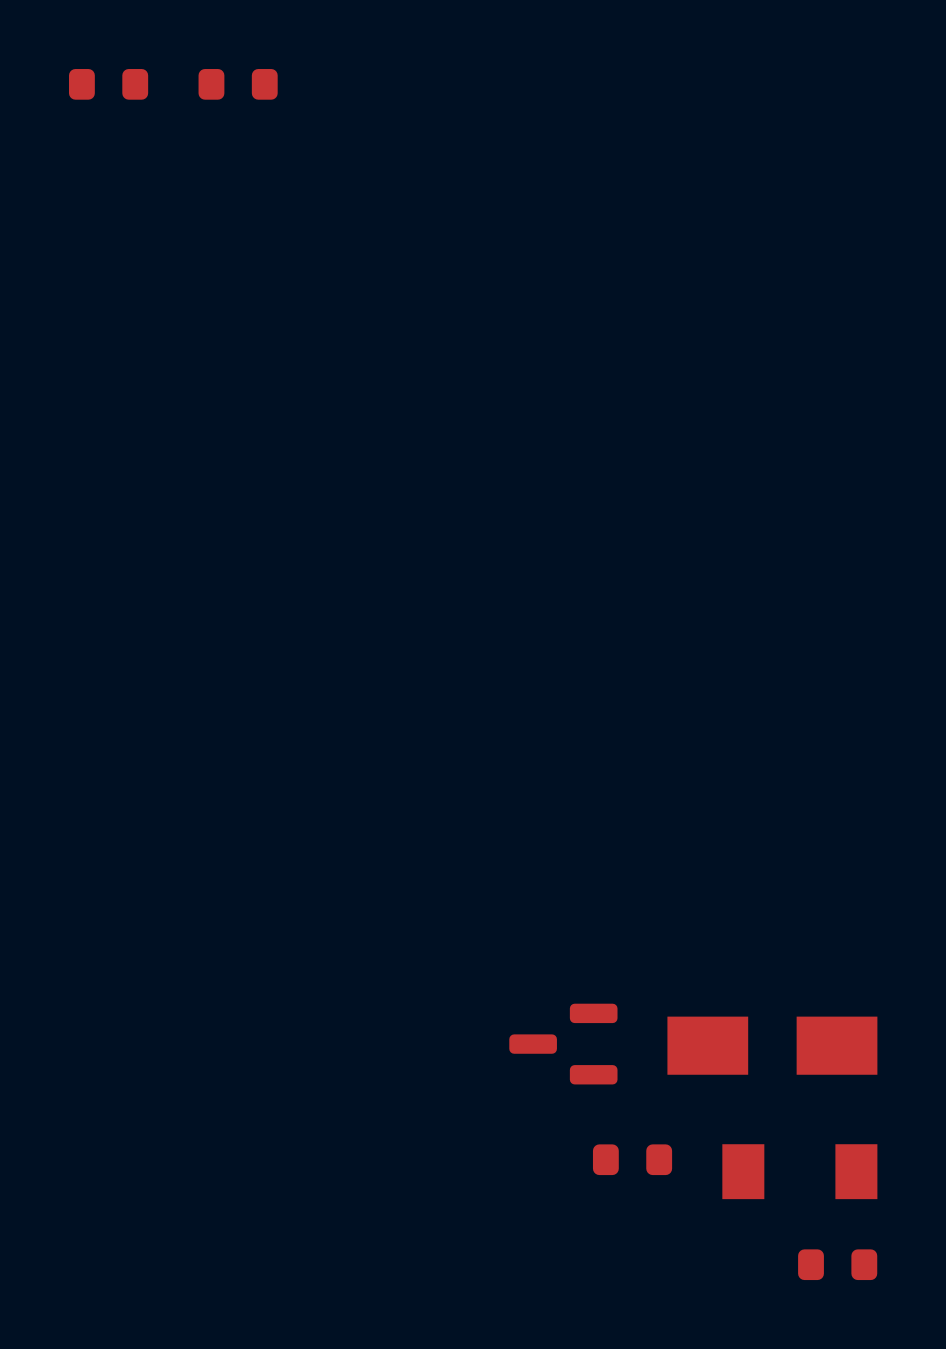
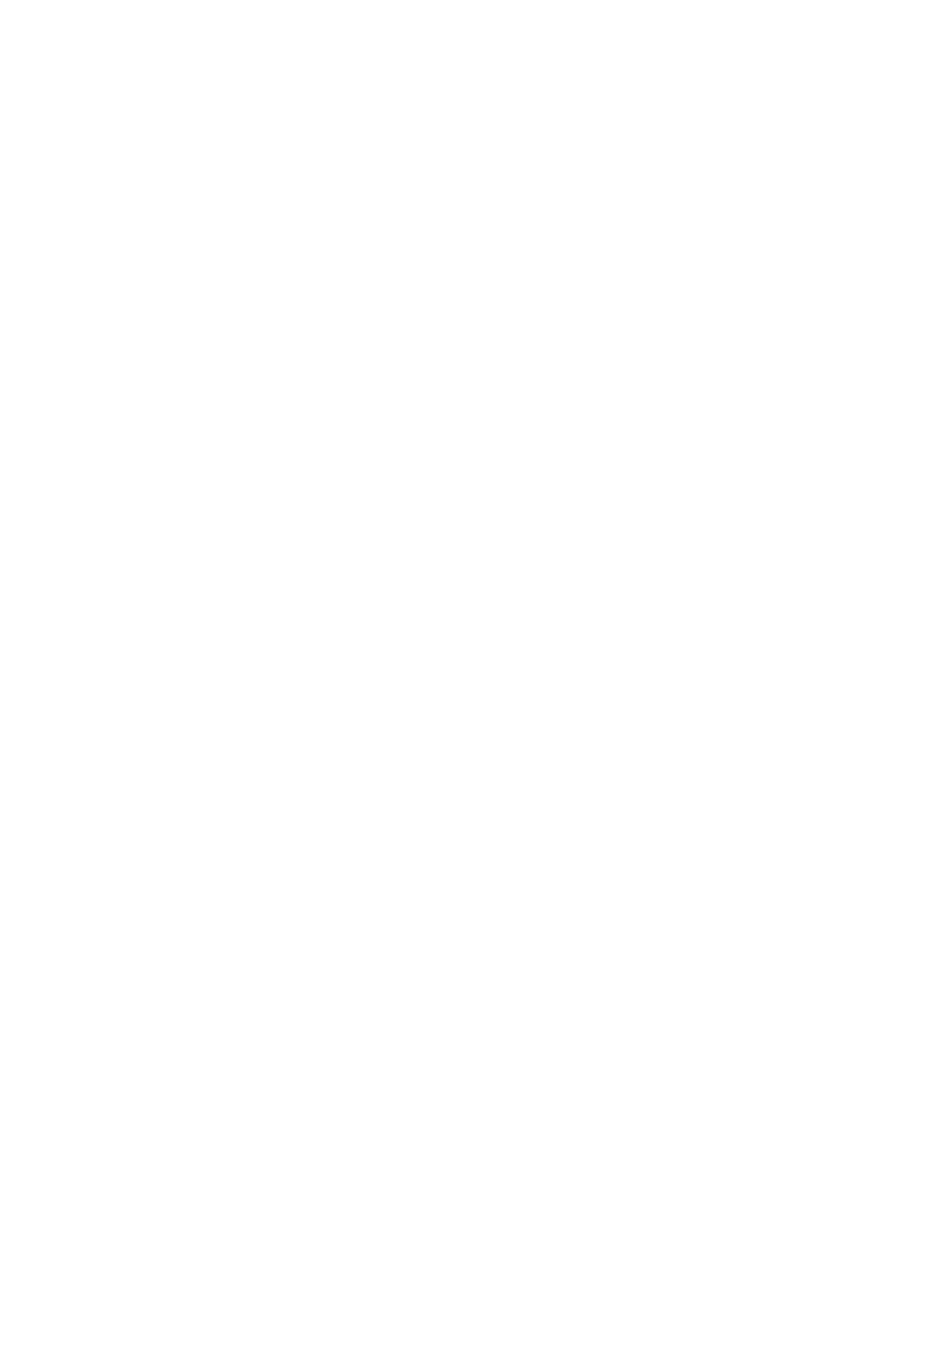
part: (108, 84) -> none
part: (238, 84) -> none
part: (563, 1044) -> none
part: (772, 1045) -> none
part: (632, 1159) -> none
part: (799, 1171) -> none
part: (837, 1264) -> none

